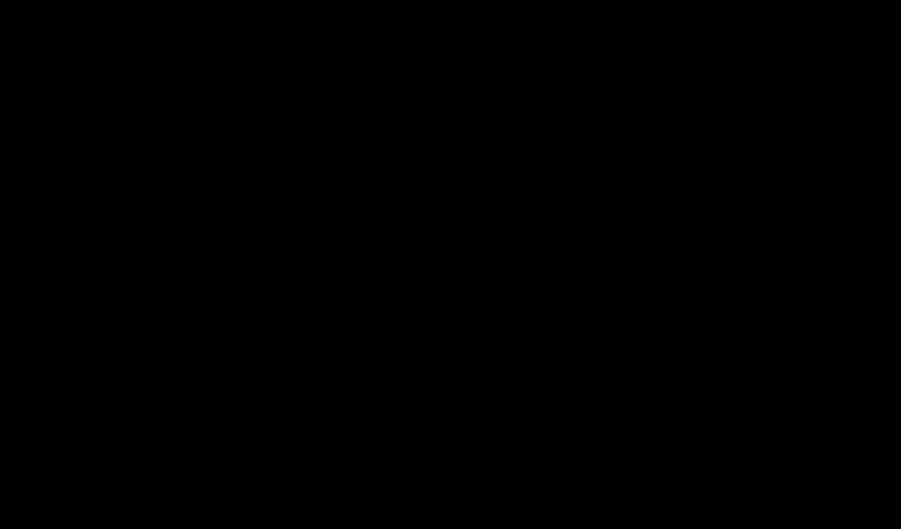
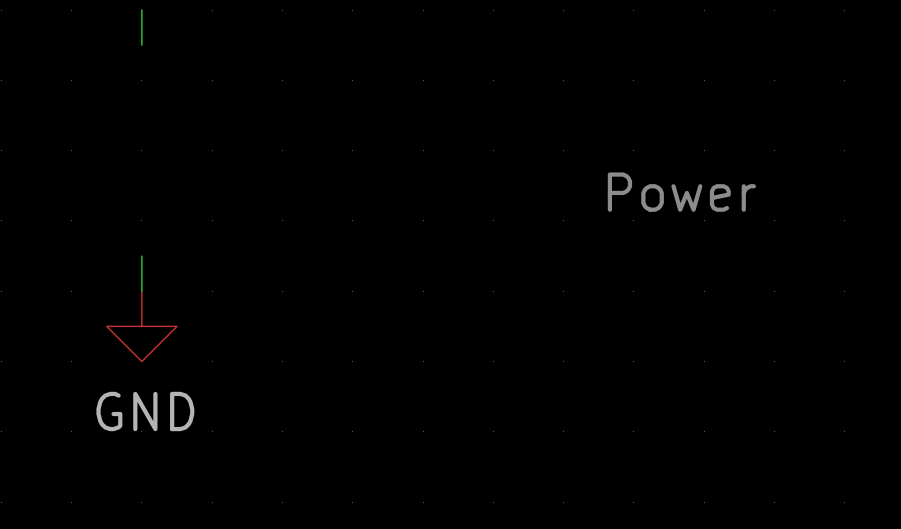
wire: none -> (141, 10) (141, 45)
text: none -> Power (681, 192)
wire: none -> (141, 256) (141, 291)
power symbol: none -> GND (141, 326)

